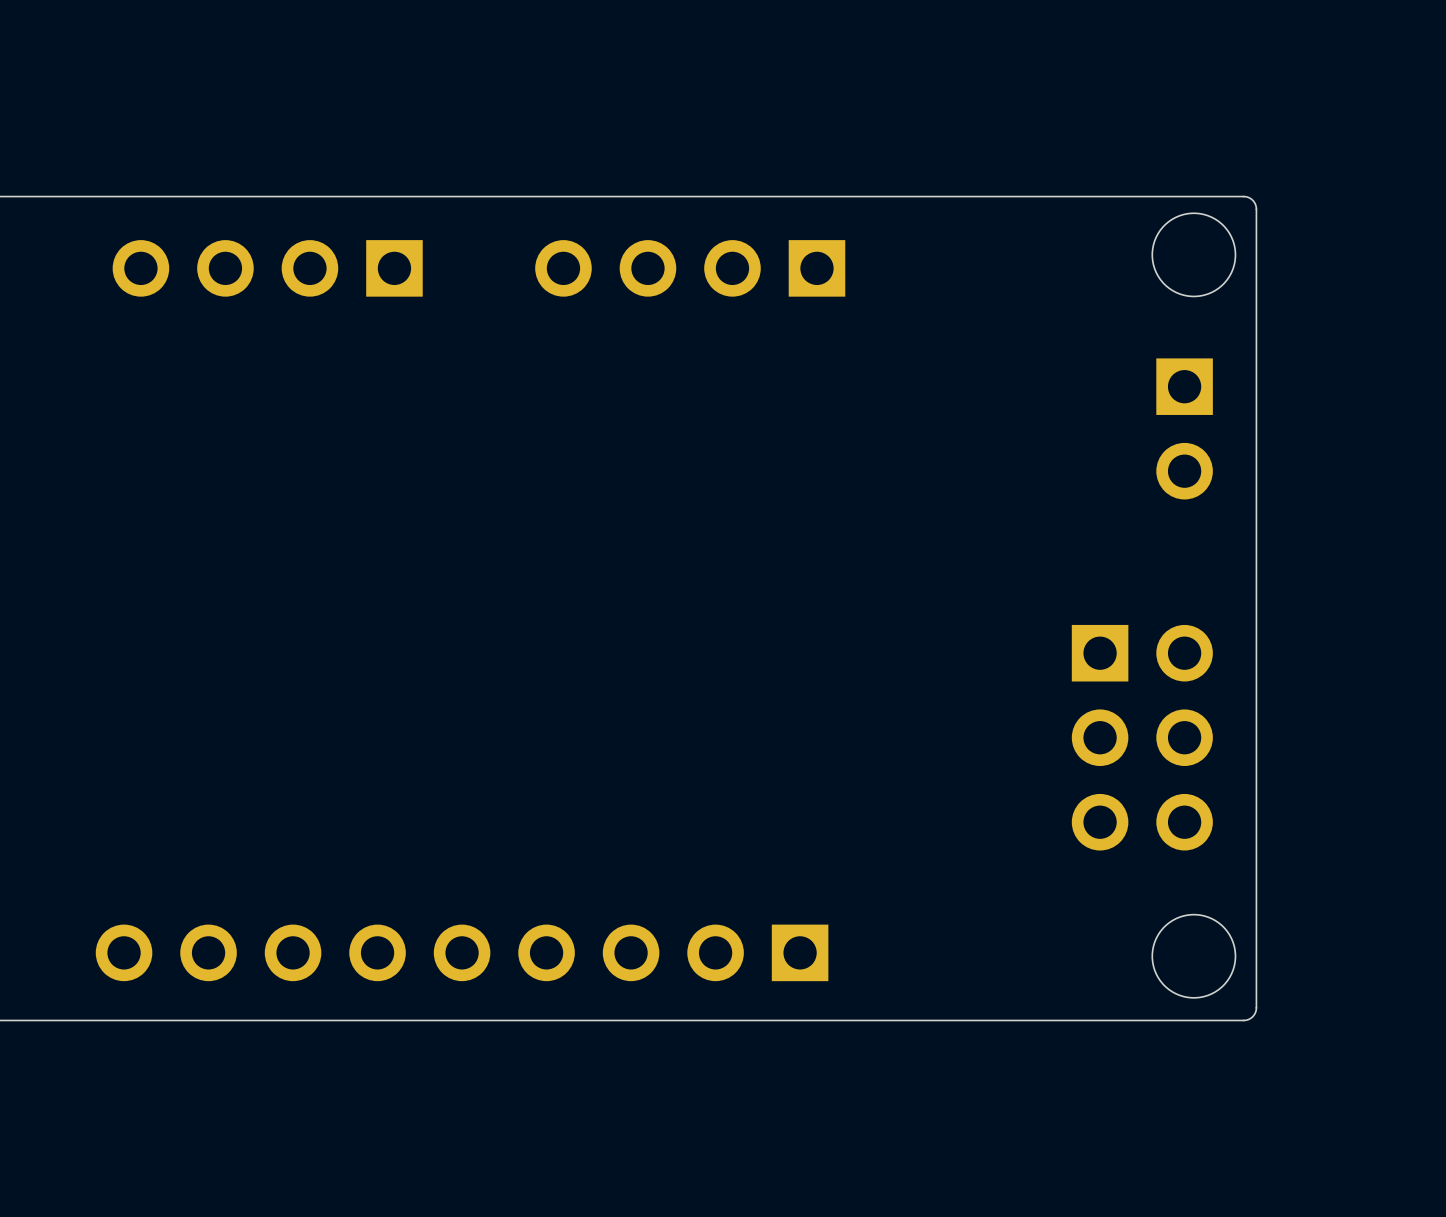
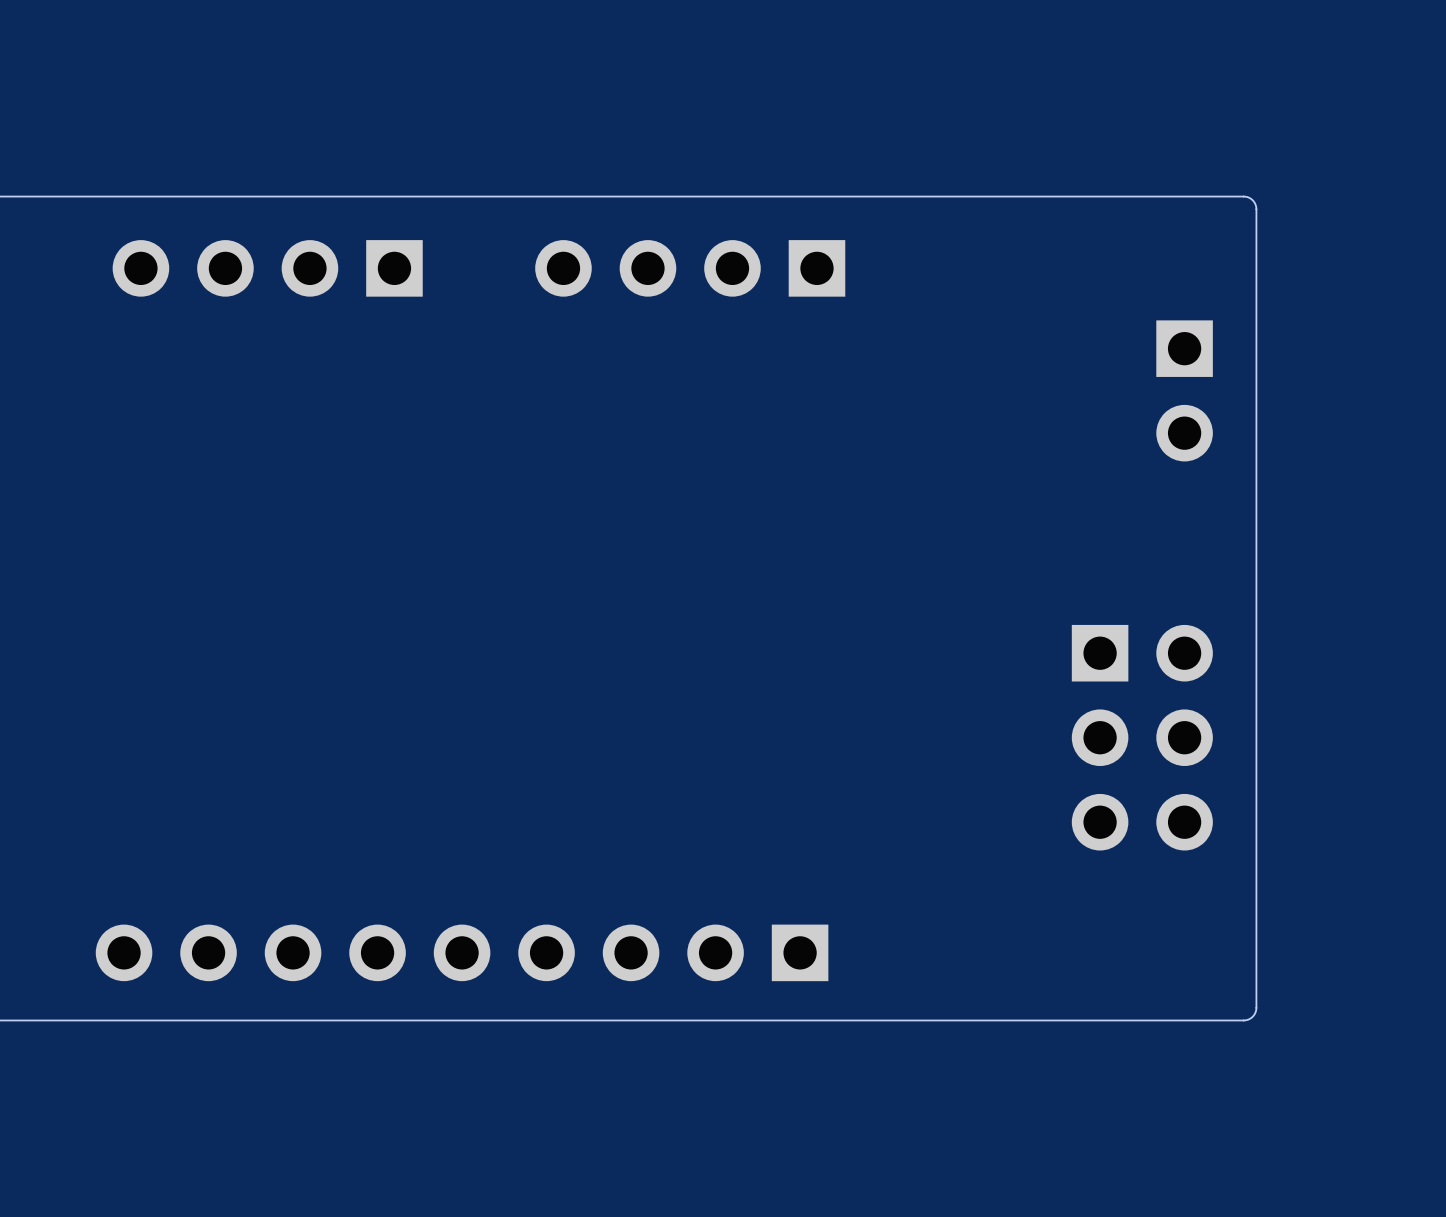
round board edge: [1151, 212, 1237, 298] -> none
part position: (1184, 428) -> (1184, 390)
round board edge: [1151, 913, 1237, 999] -> none

